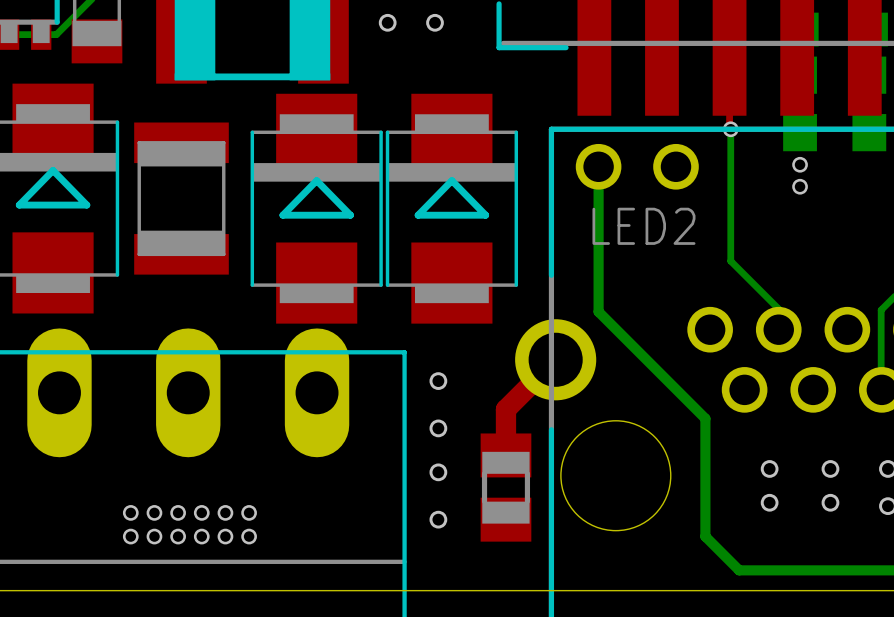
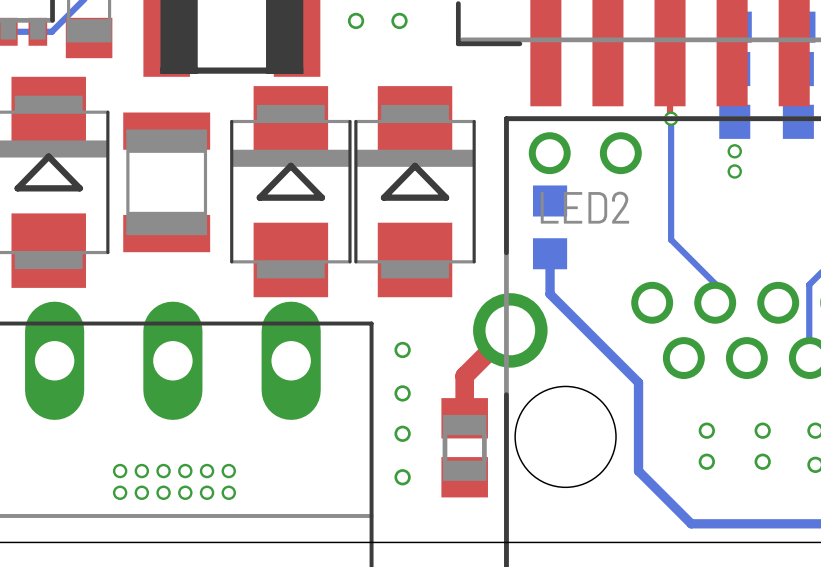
bottom track: (598, 166) (598, 311) (705, 418) (705, 536) (739, 570) (752, 570) -> (550, 253) (550, 294) (638, 382) (638, 471) (691, 523)
part: none -> (550, 227)

